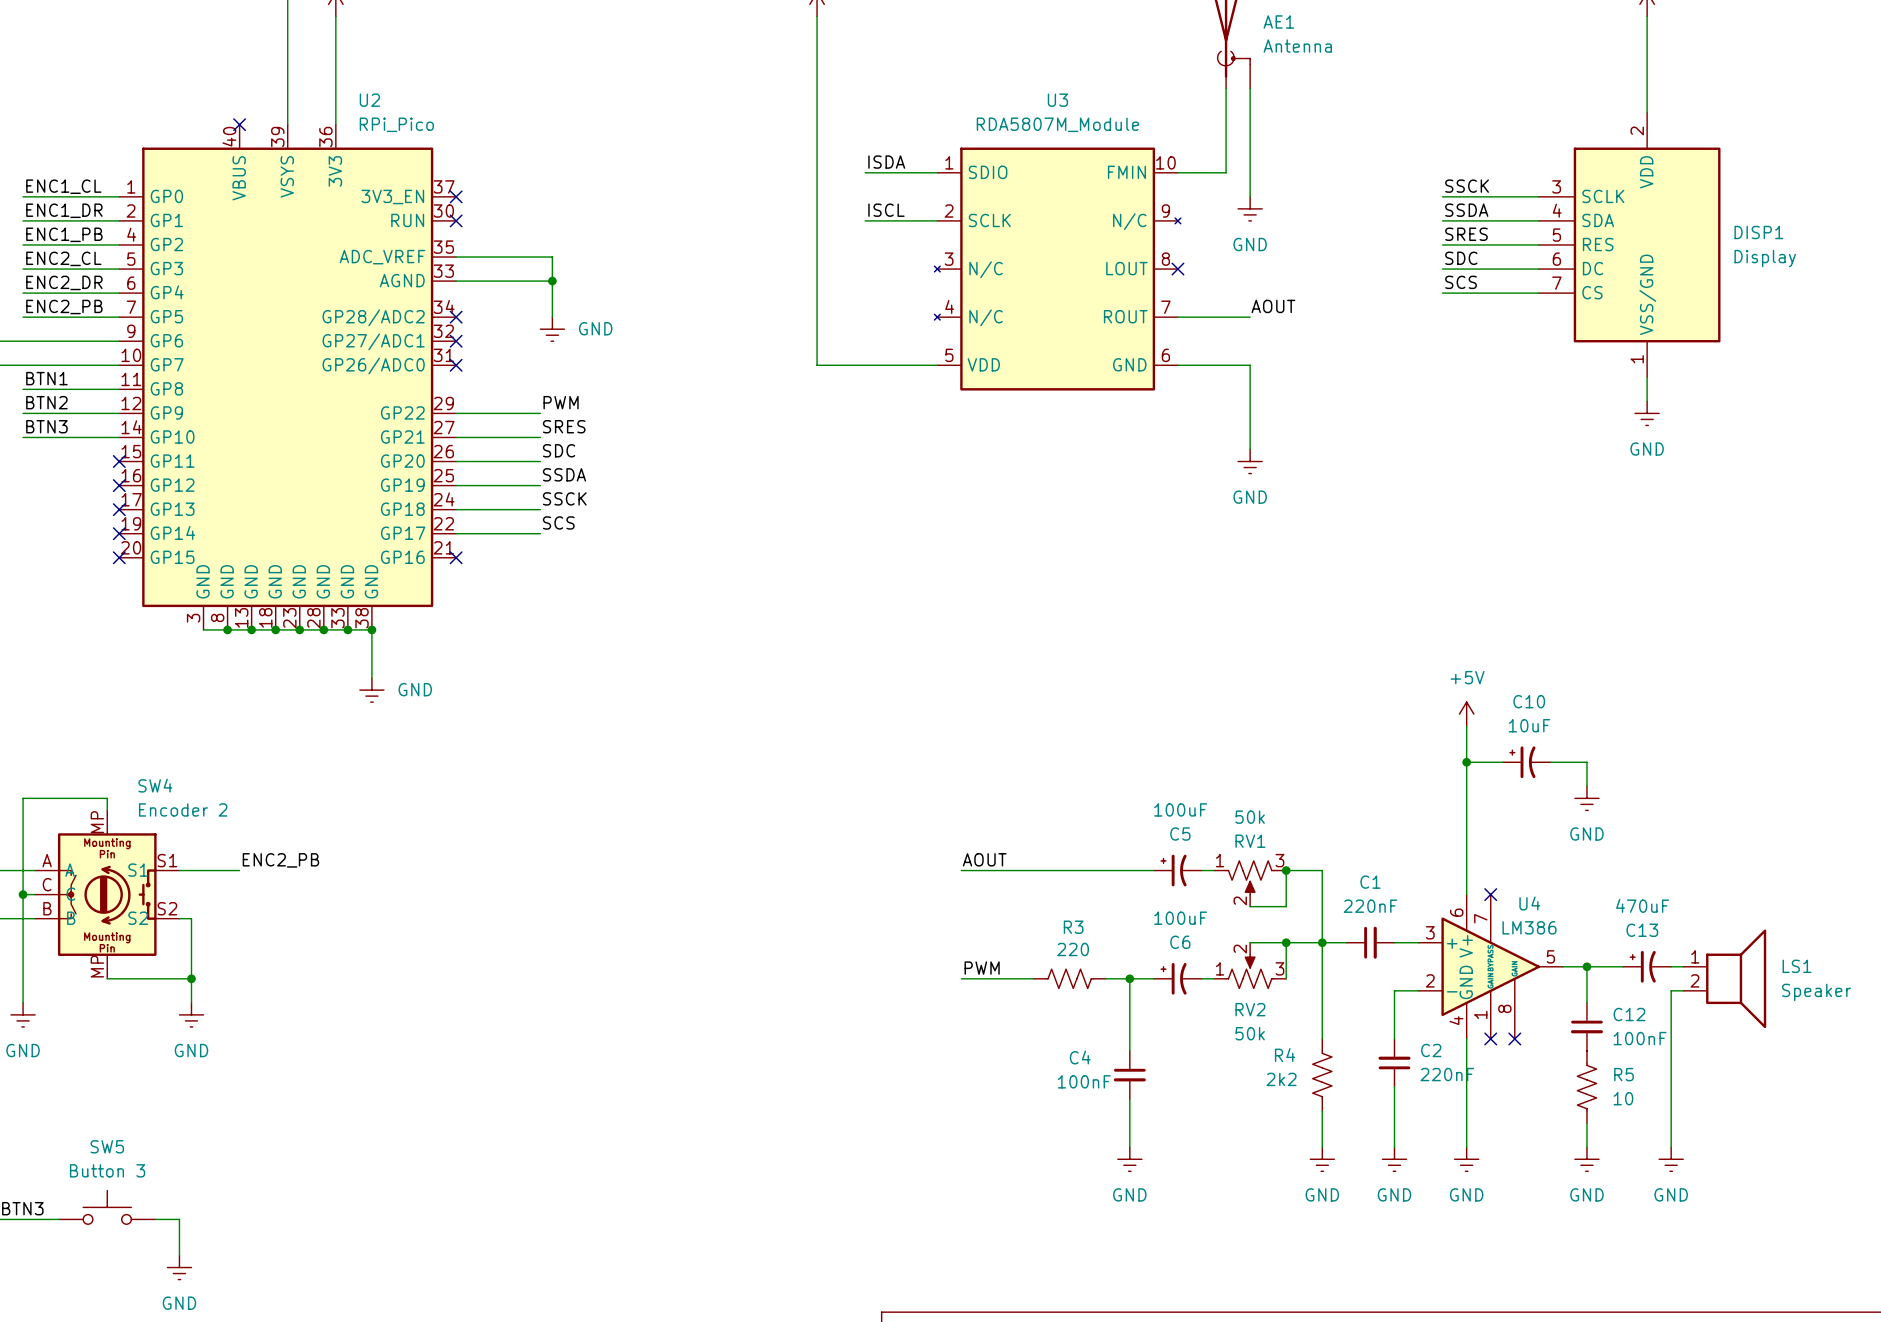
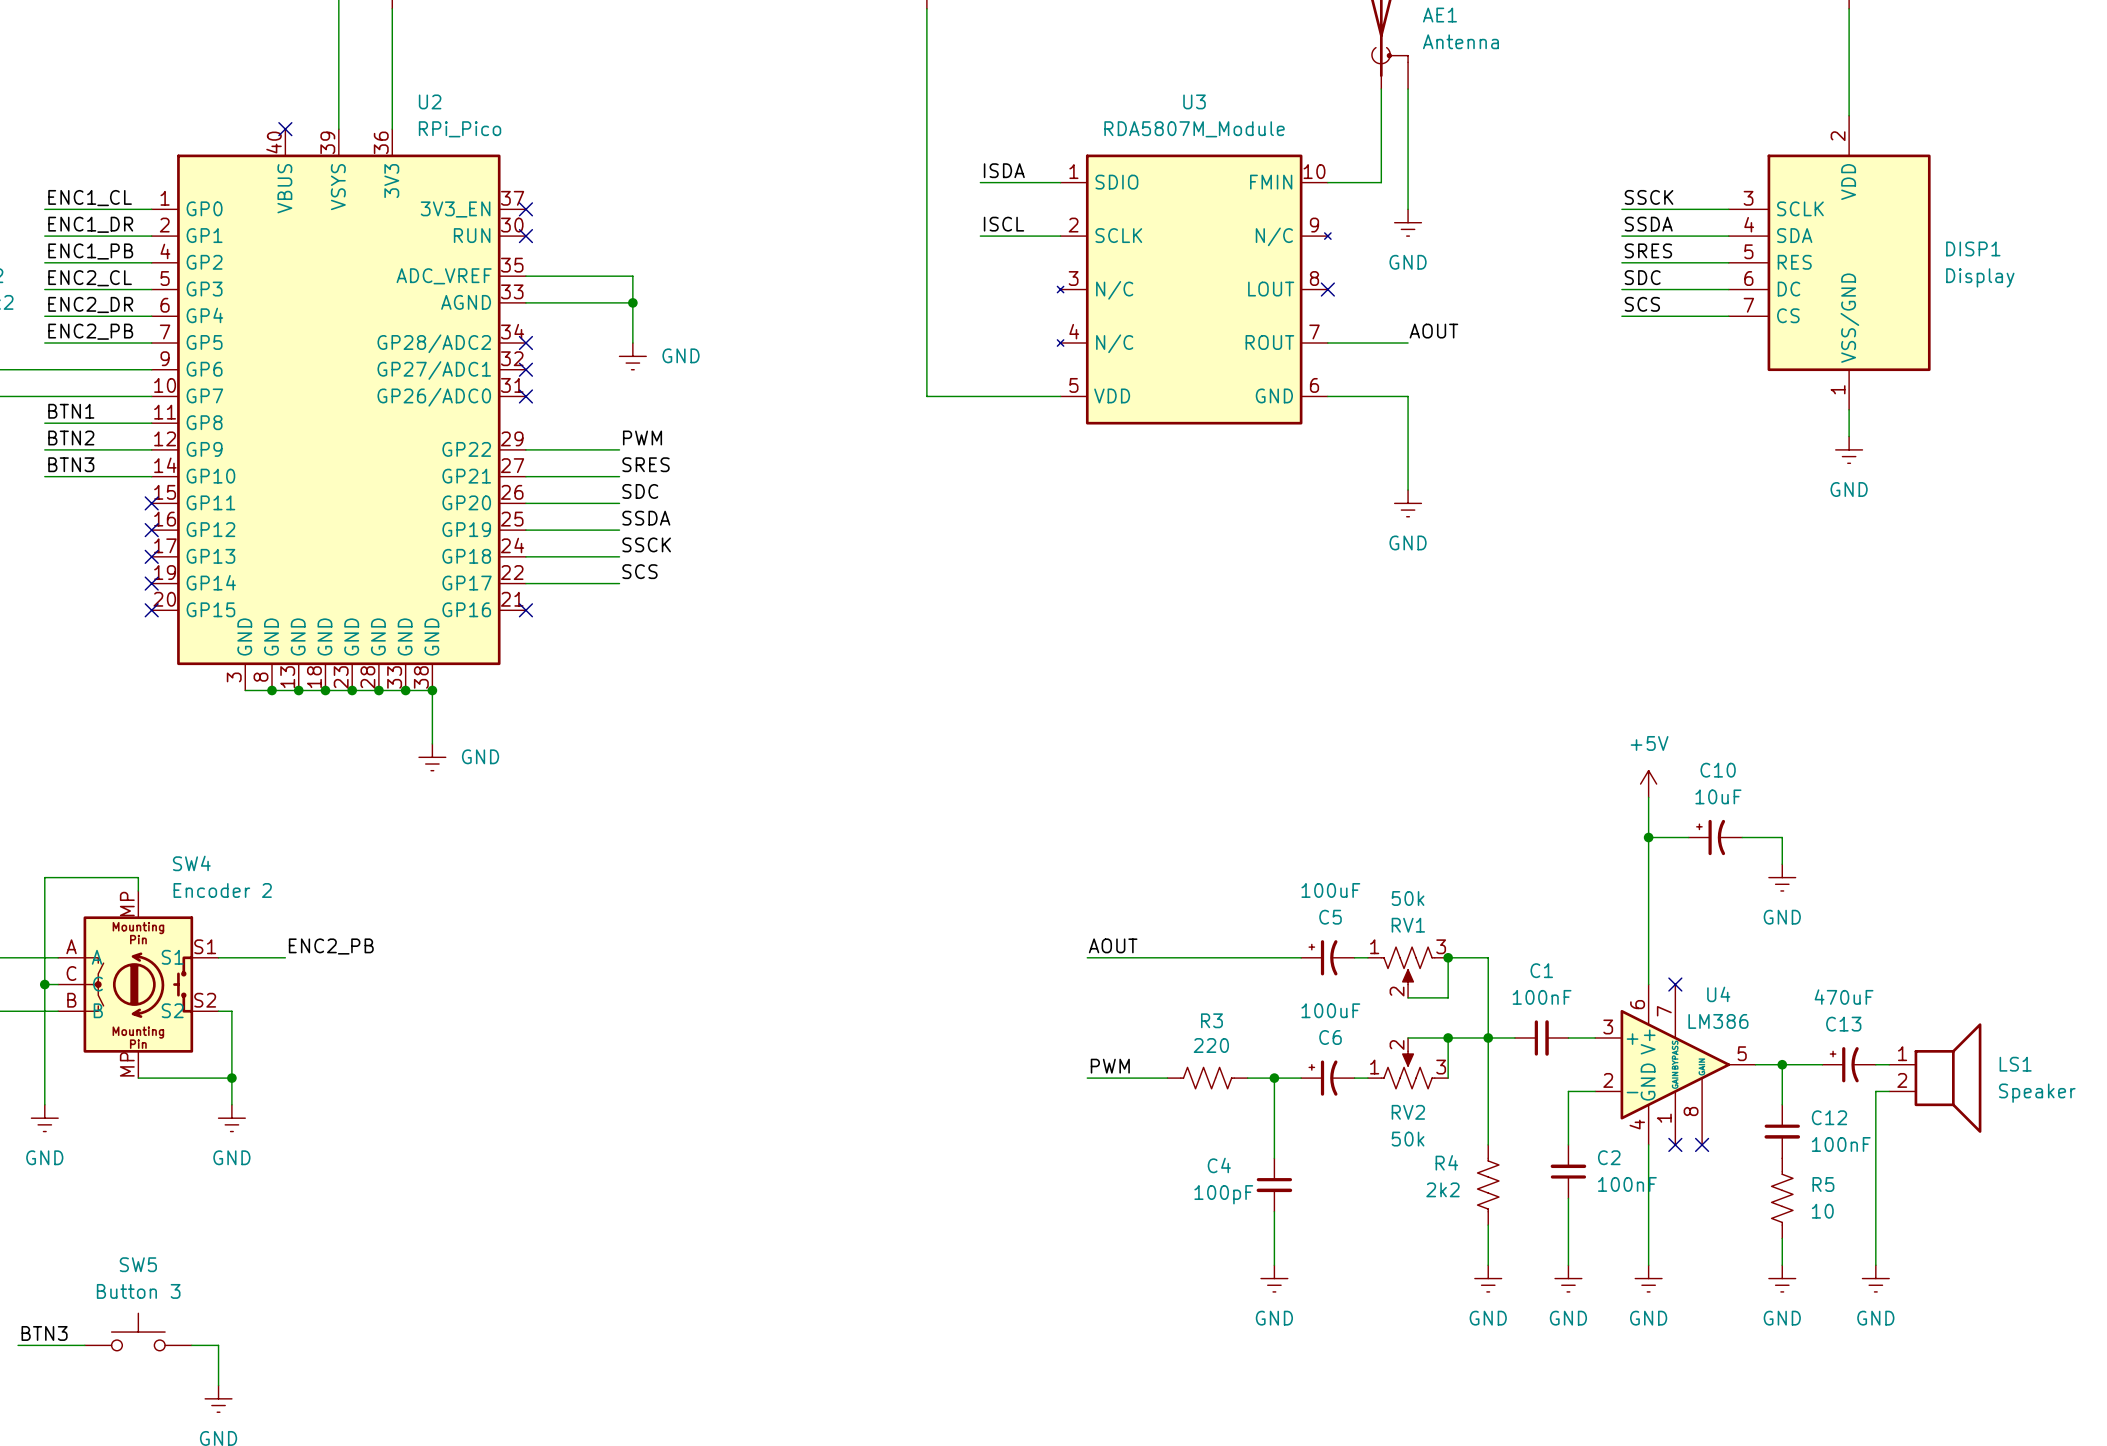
C1 value: 220nF (1370, 906) -> 100nF (1542, 997)
C2 value: 220nF (1447, 1074) -> 100nF (1627, 1184)
C4 value: 100nF (1084, 1081) -> 100pF (1223, 1194)

